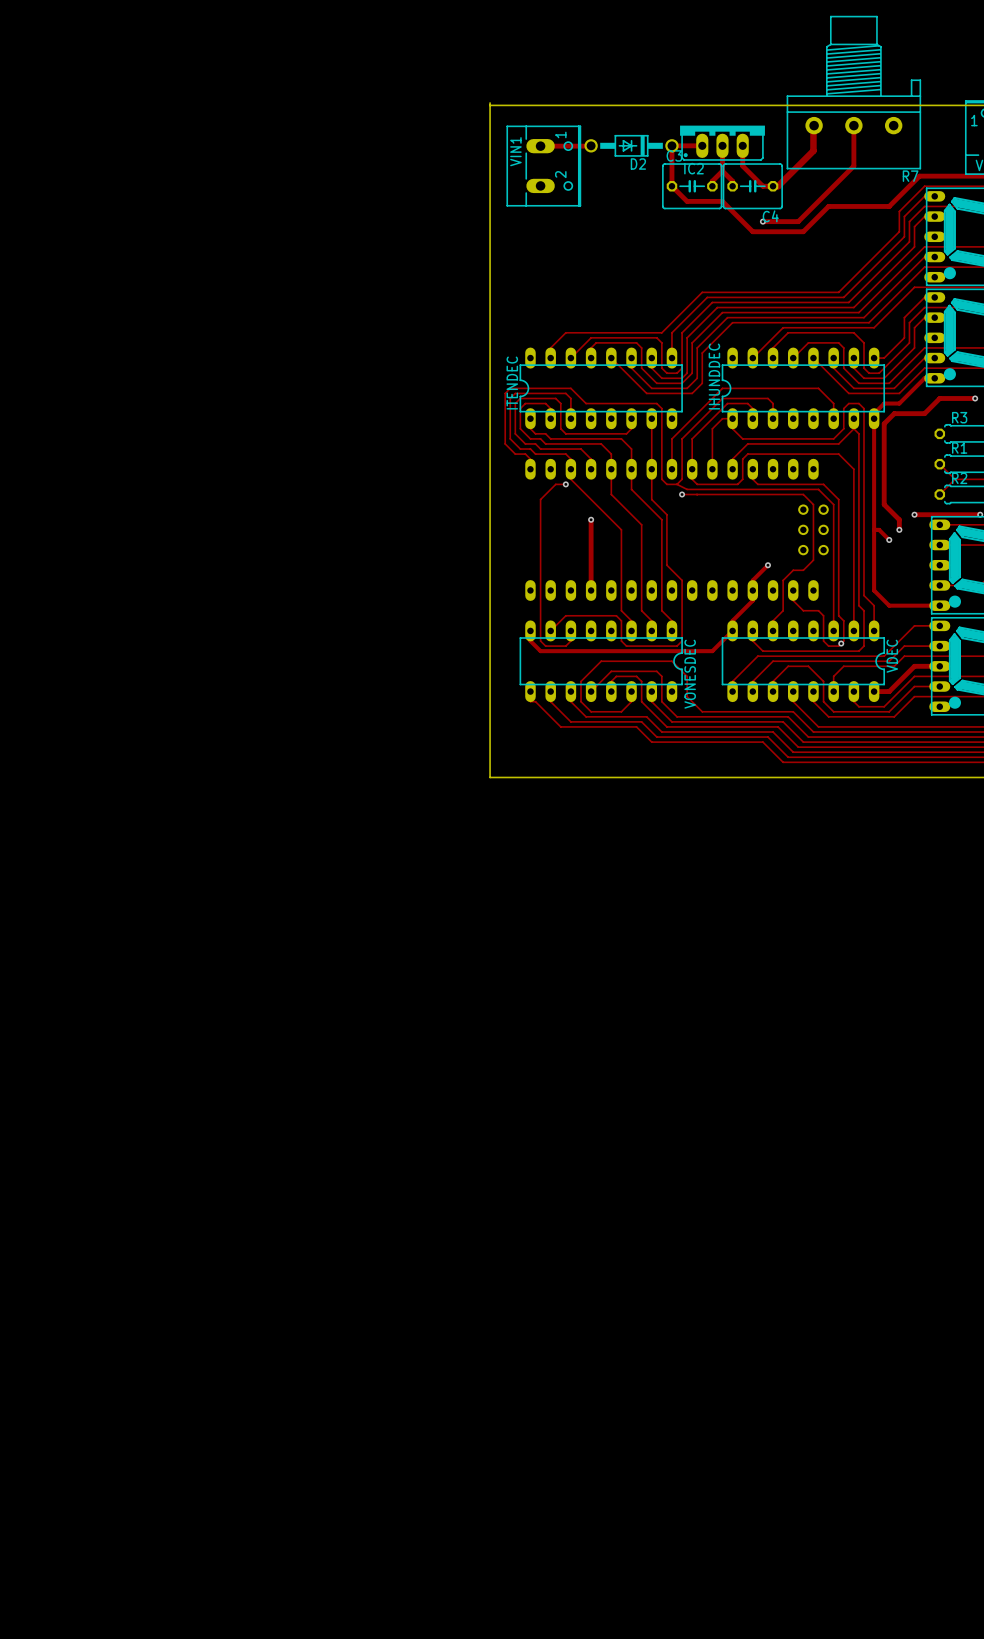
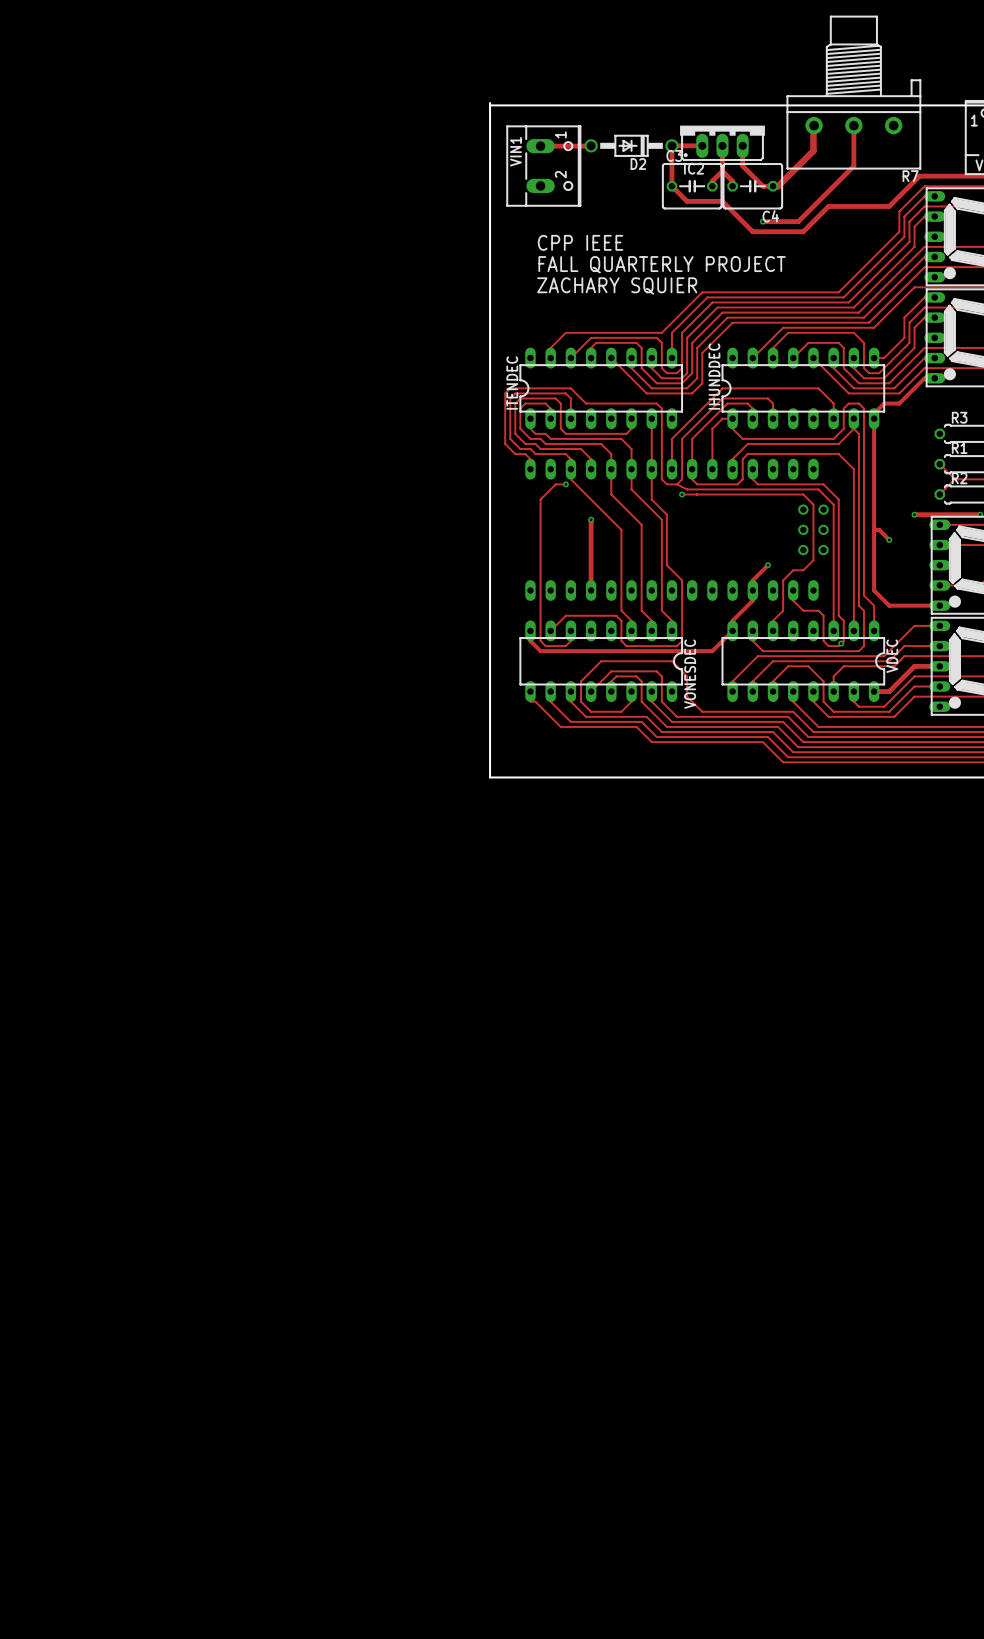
text: none -> CPP IEEE (580, 242)
text: none -> FALL QUARTERLY PROJECT (662, 264)
text: none -> ZACHARY SQUIER (617, 285)
track: (975, 398) (939, 398) (924, 413) (894, 413) (884, 423) (884, 504) (899, 519) (899, 529) -> none
via: (975, 398) -> none
via: (899, 529) -> none

